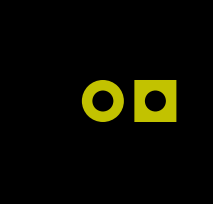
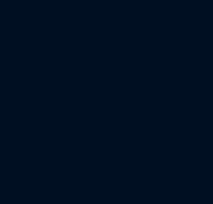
part: (129, 100) -> none

